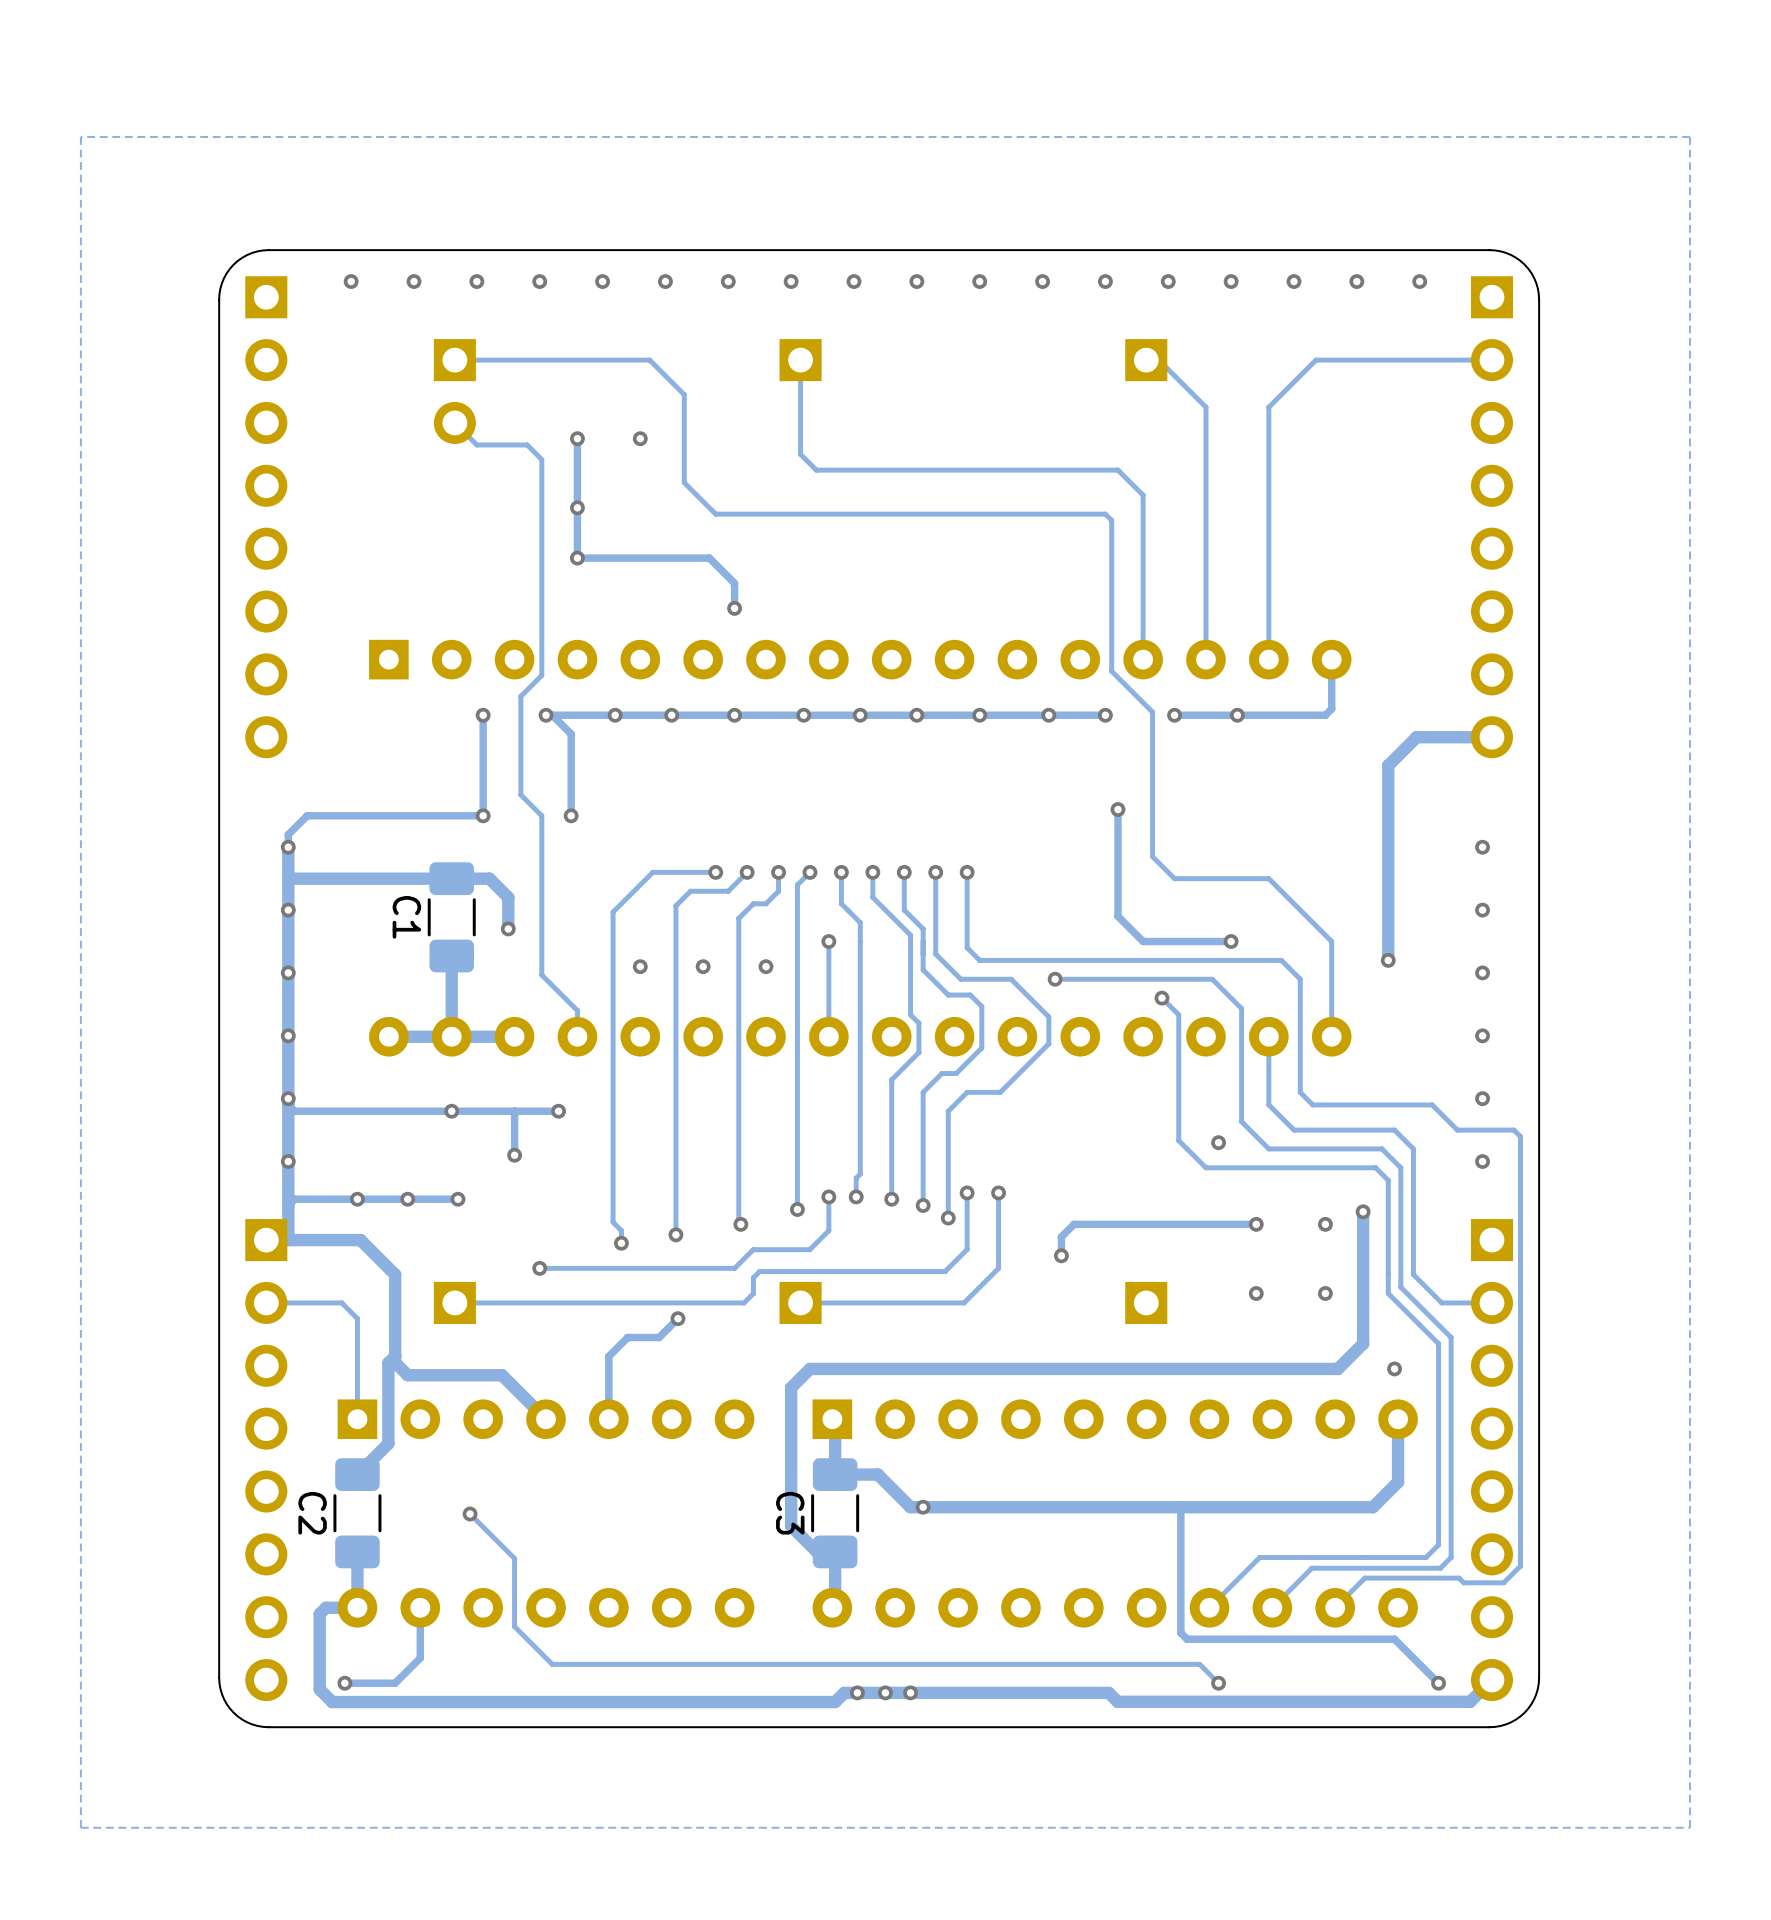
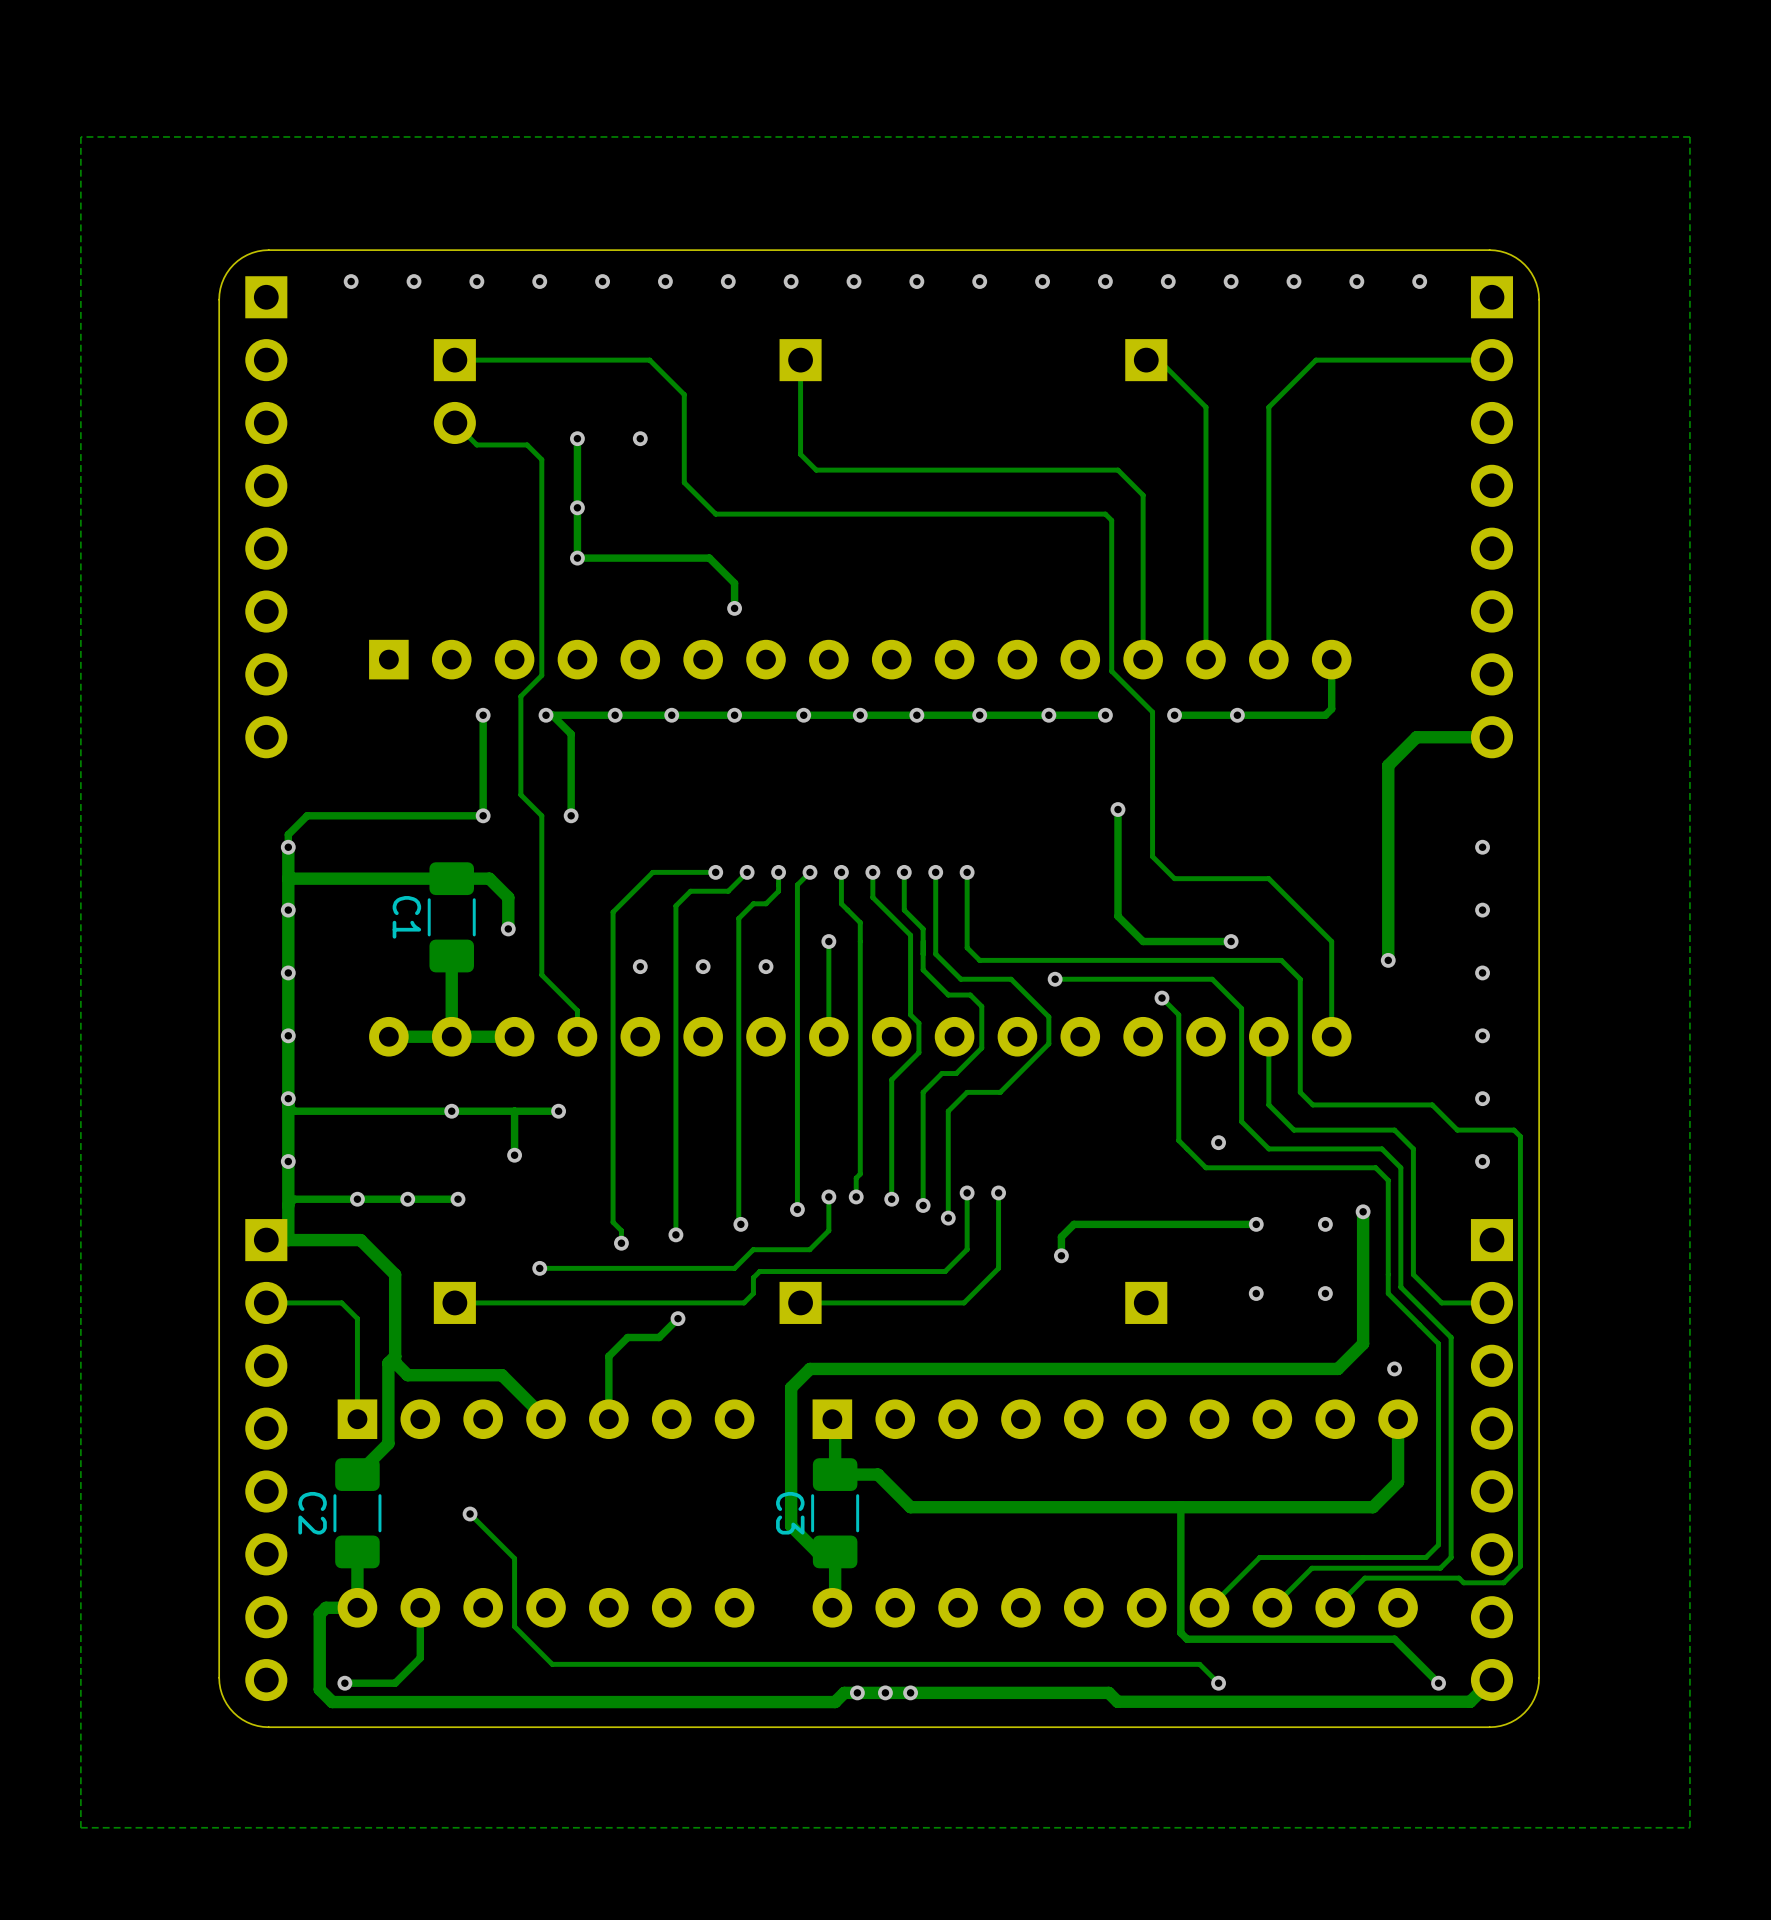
via: (923, 1507) -> none

